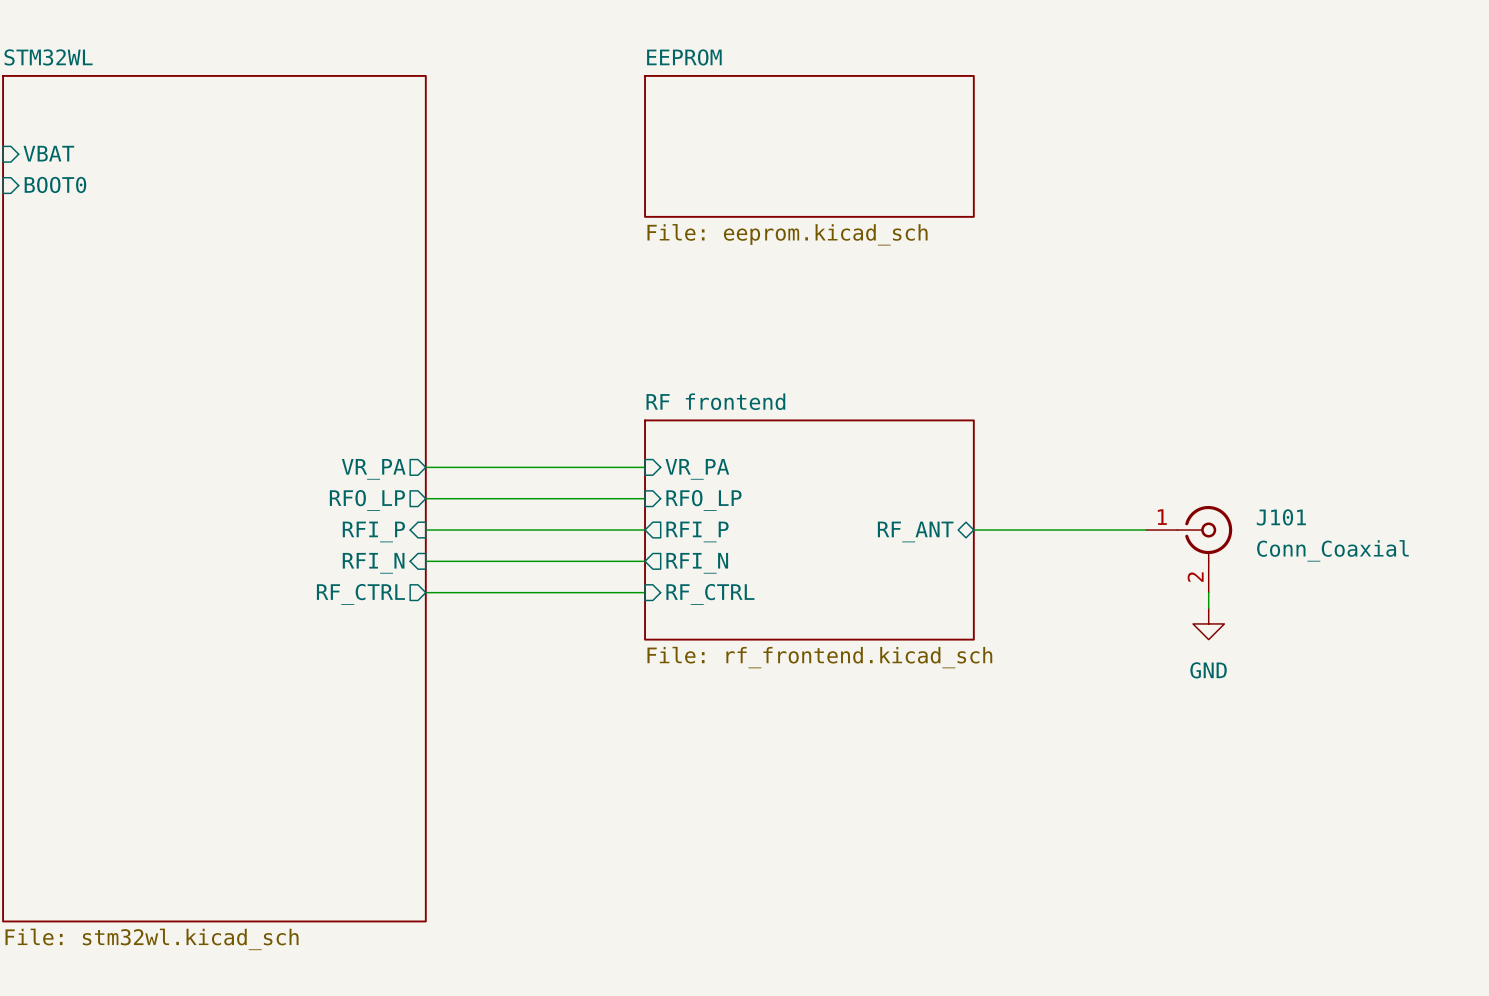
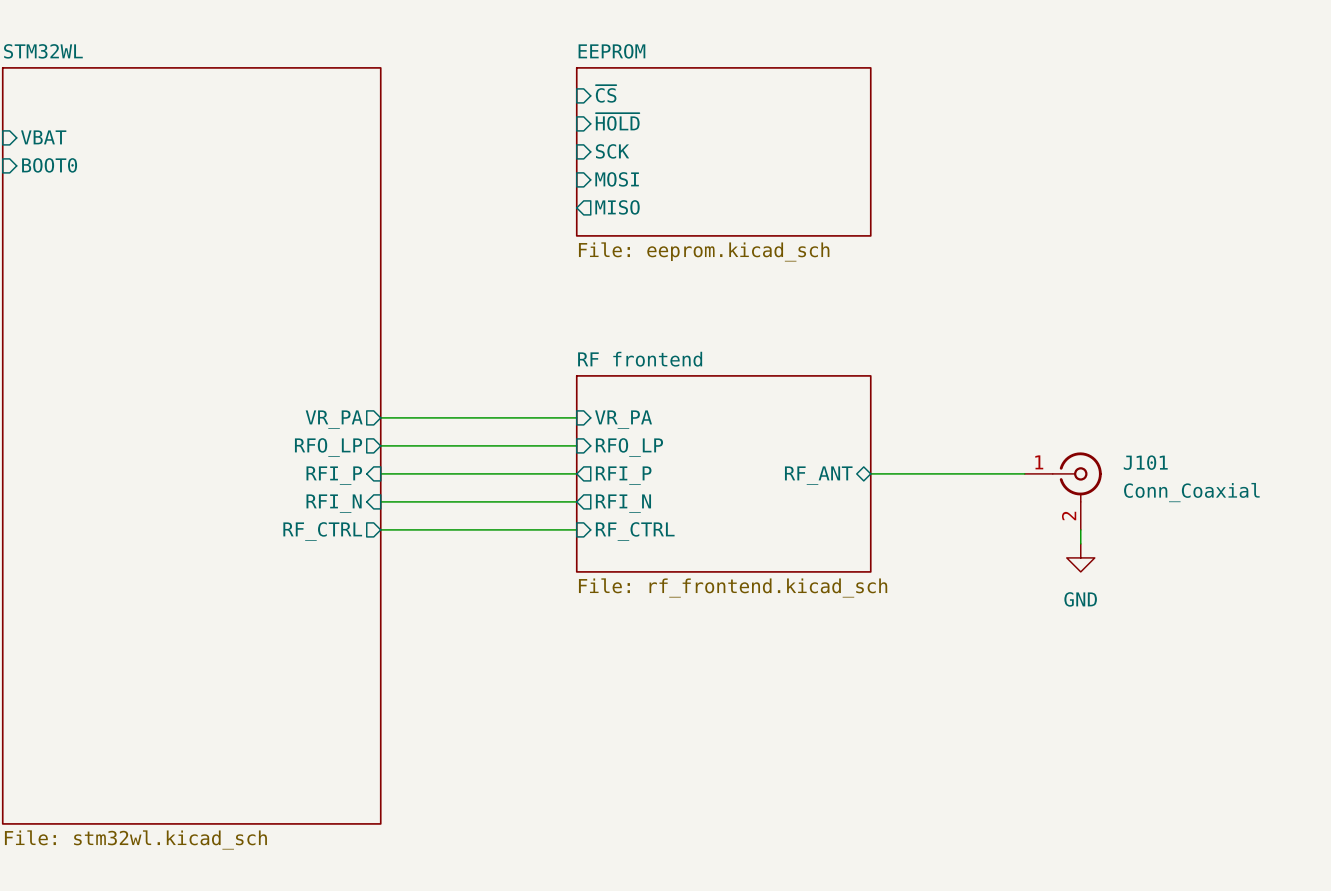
sheet pin: none -> ~{CS} (606, 93)
sheet pin: none -> ~{HOLD} (617, 121)
sheet EEPROM: File: eeprom.kicad_sch (809, 146) -> none
sheet pin: none -> SCK (612, 151)
sheet EEPROM: none -> File: eeprom.kicad_sch (723, 151)
sheet pin: none -> MOSI (617, 179)
sheet pin: none -> MISO (617, 207)

